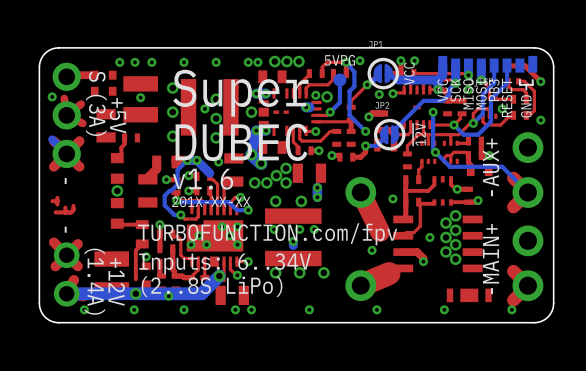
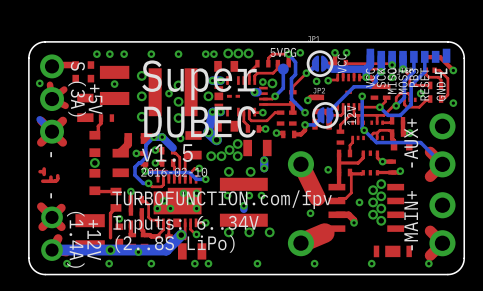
text: v1.6 (203, 179) -> v1.5 (167, 153)
text: 201X-XX-XX (211, 201) -> 2016-02-10 (174, 172)

